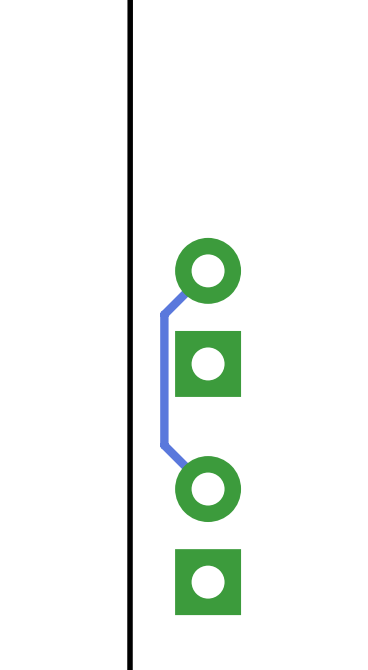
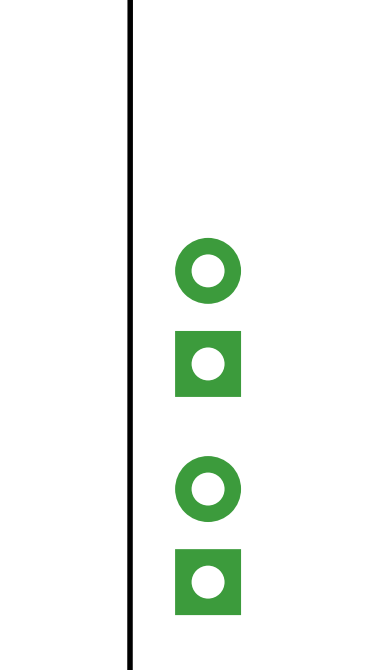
track: (208, 270) (164, 314) (164, 445) (208, 489) -> none

